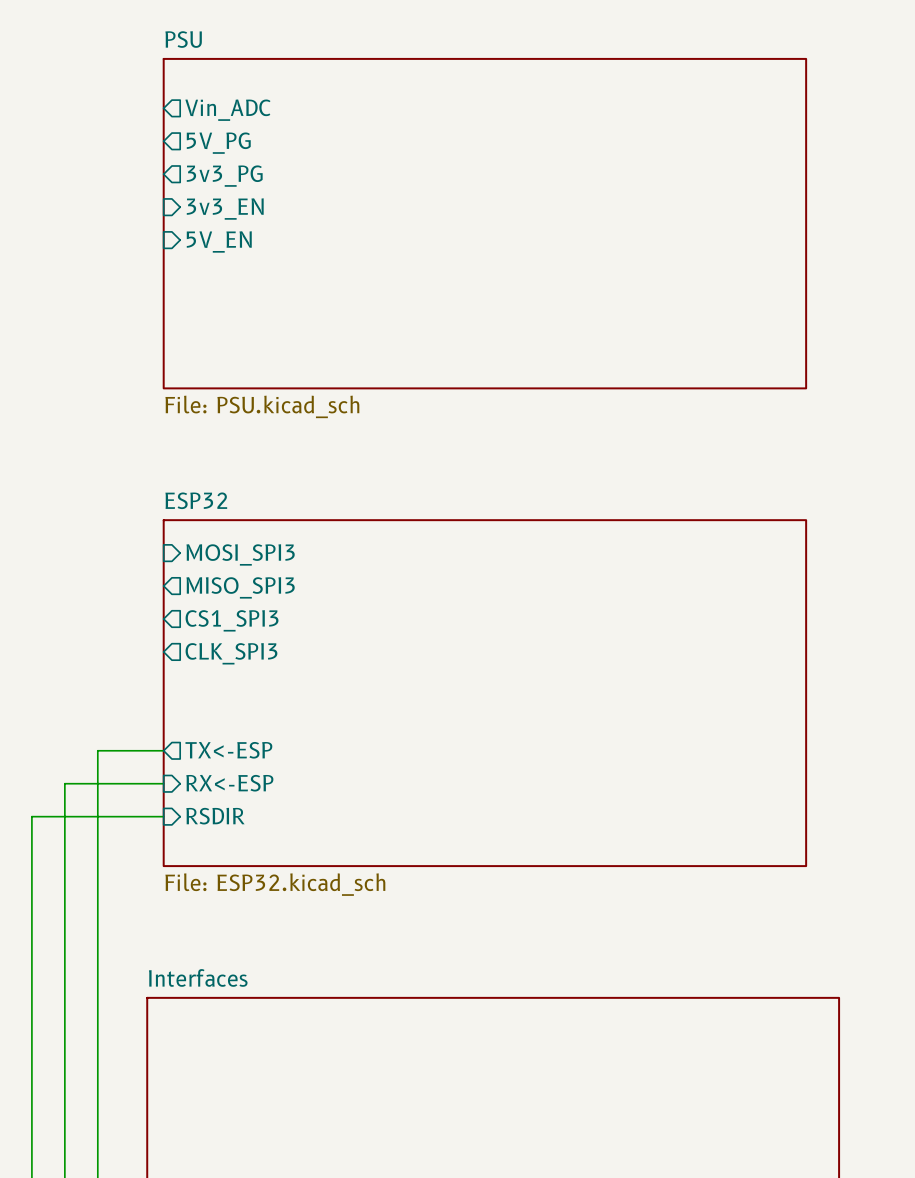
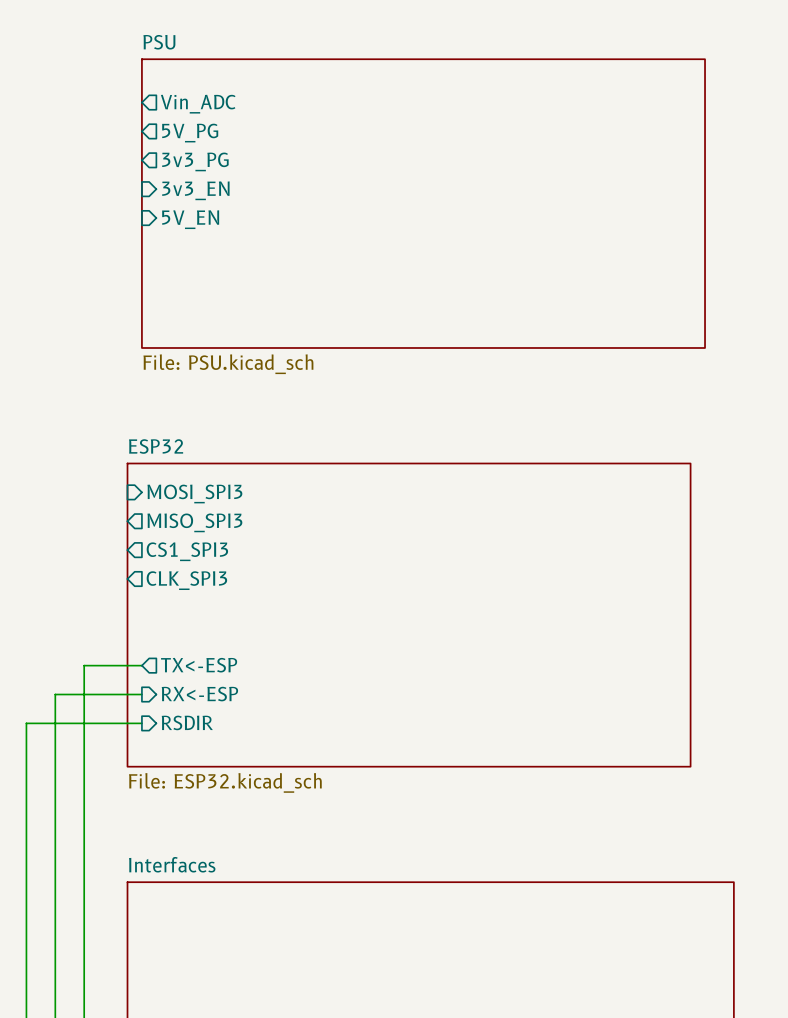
sheet pin position: MOSI_SPI3 (240, 554) -> MOSI_SPI3 (194, 493)
sheet pin position: MISO_SPI3 (240, 587) -> MISO_SPI3 (194, 522)
sheet pin position: CS1_SPI3 (232, 620) -> CS1_SPI3 (187, 551)
sheet pin position: CLK_SPI3 (231, 653) -> CLK_SPI3 (186, 580)
sheet ESP32 position: (484, 693) -> (409, 615)

